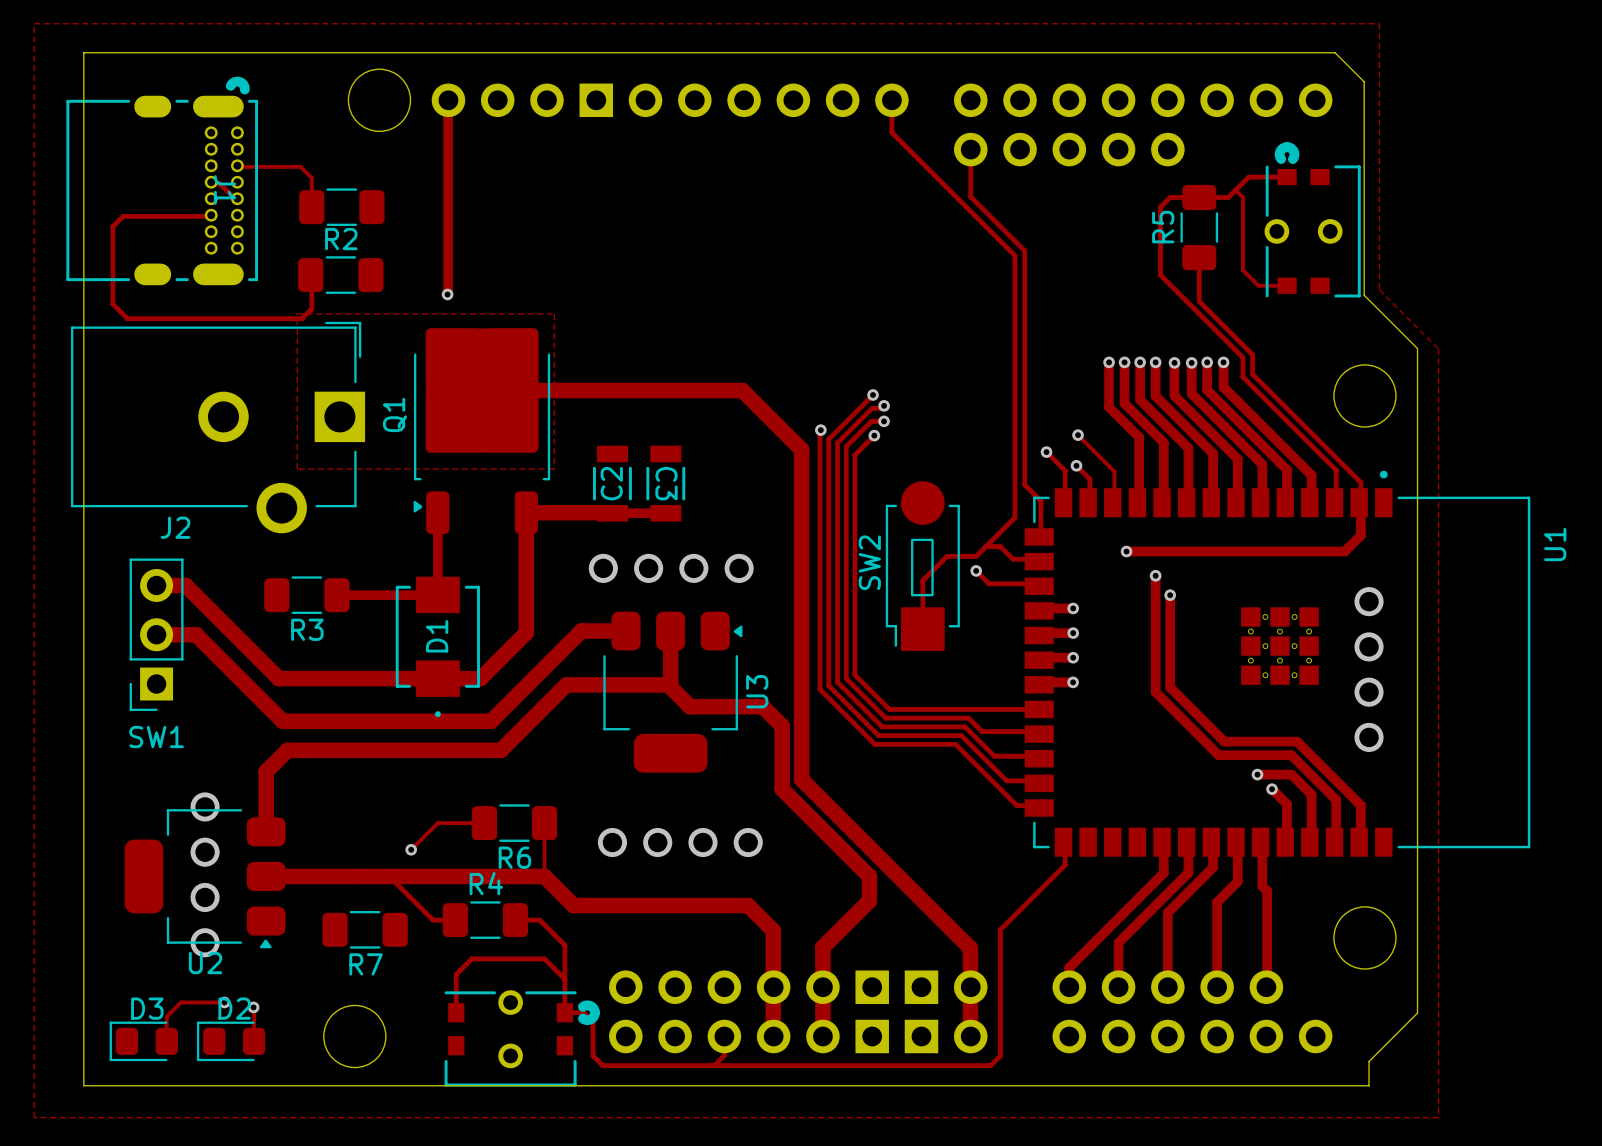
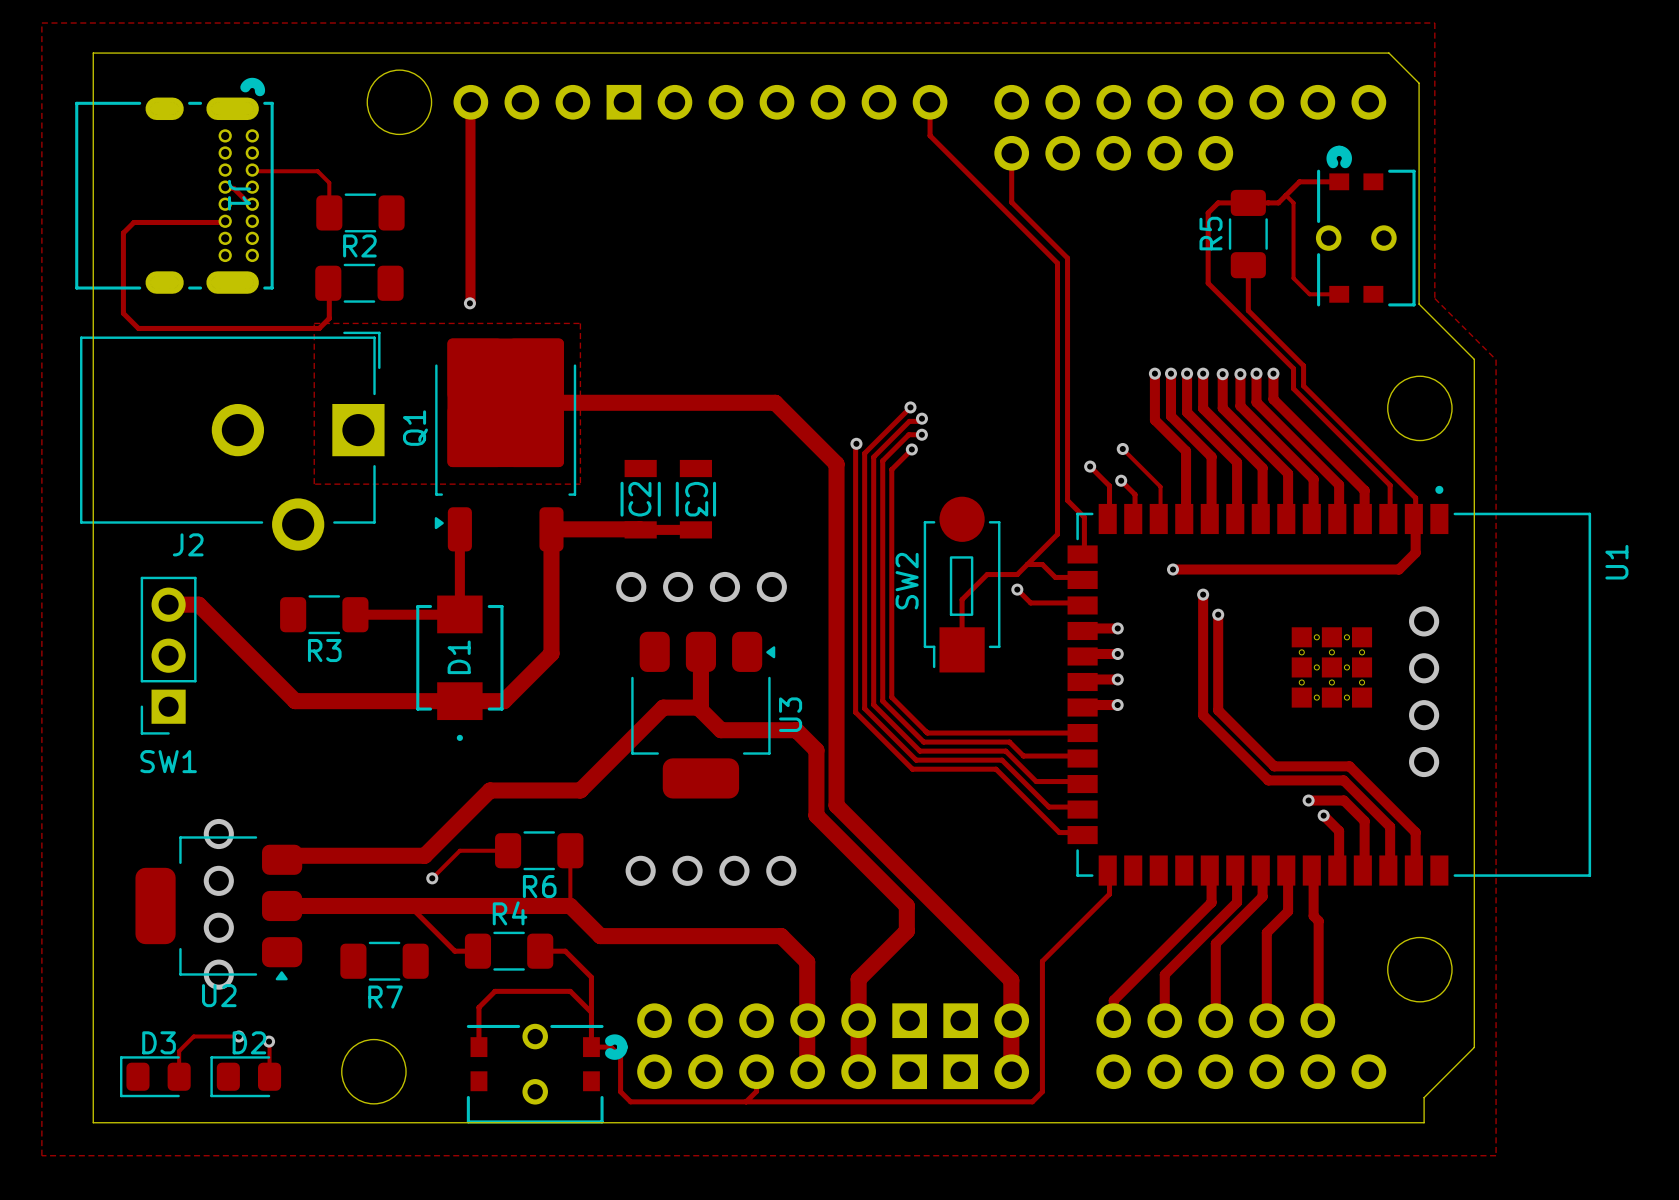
track: (626, 631) (581, 631) (491, 721) (282, 721) (196, 634) (156, 634) -> none
track: (634, 684) (566, 684) (500, 750) (287, 750) (266, 771) (266, 831) -> (663, 707) (580, 790) (490, 790) (424, 855) (286, 855) (282, 859)

